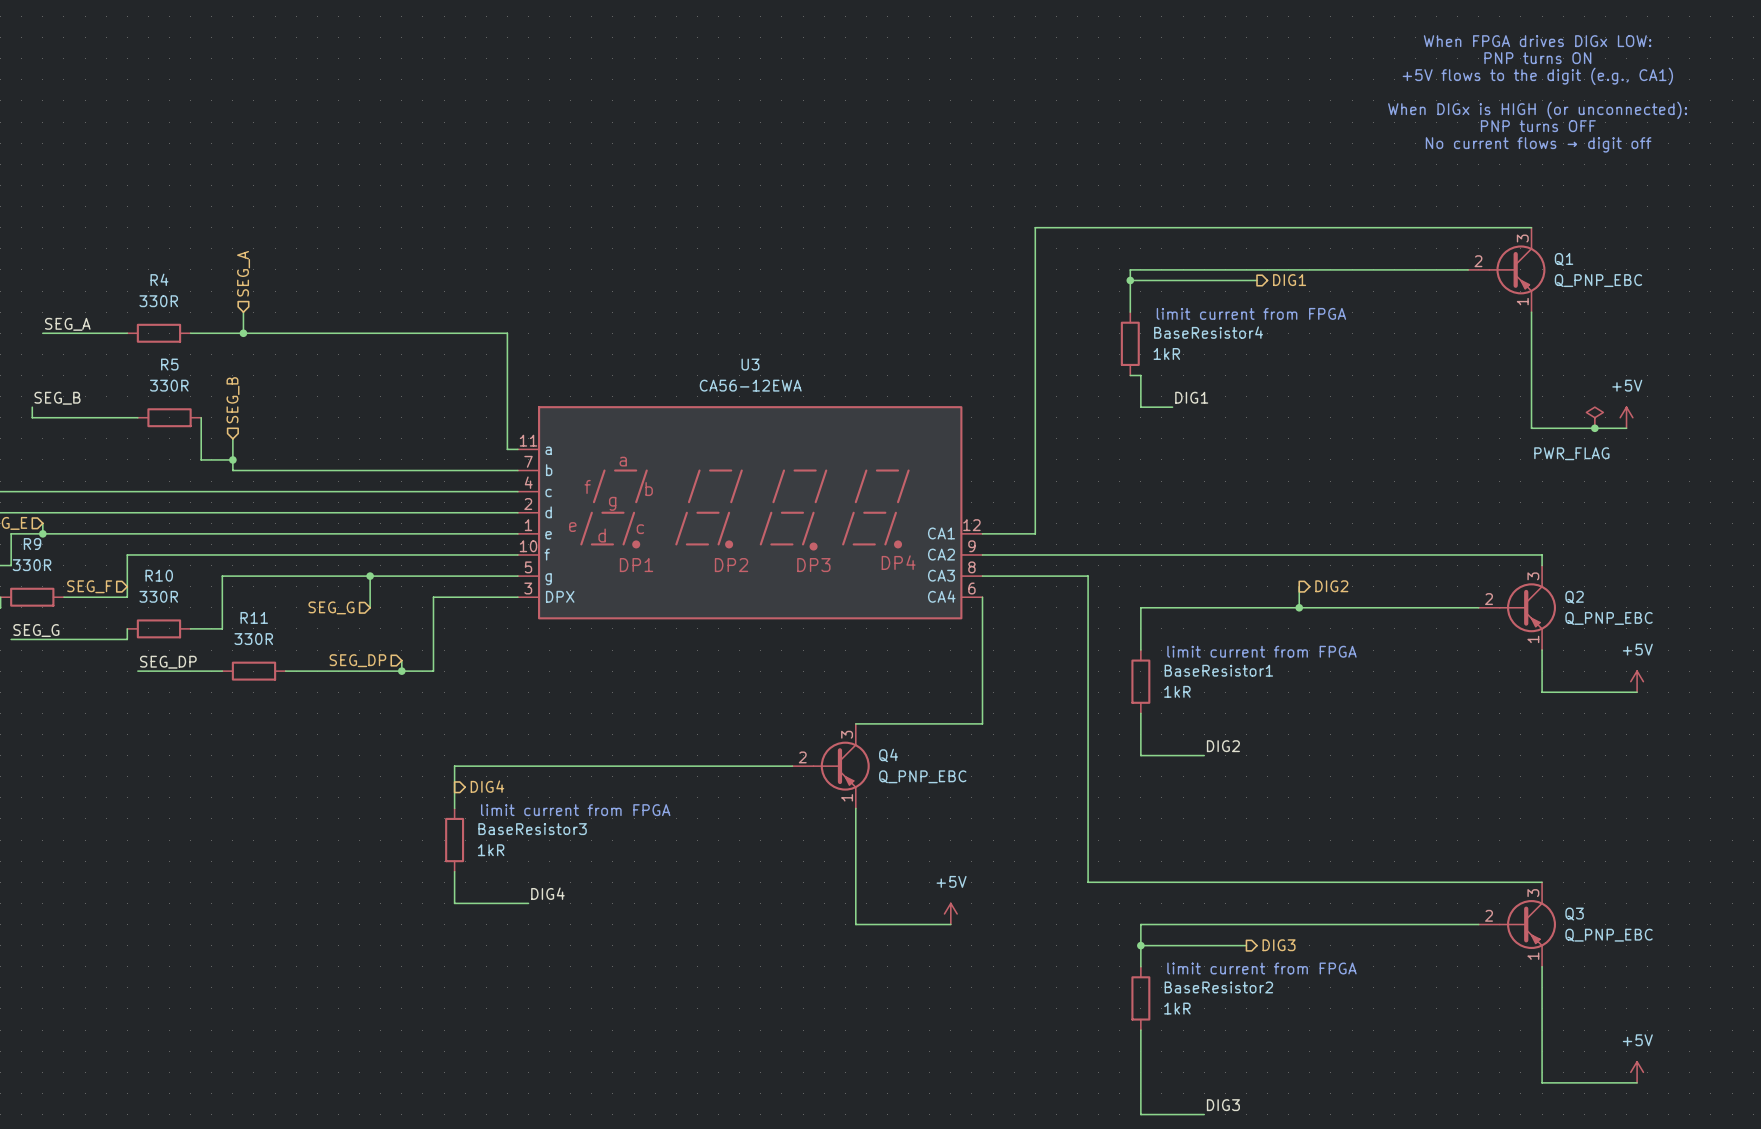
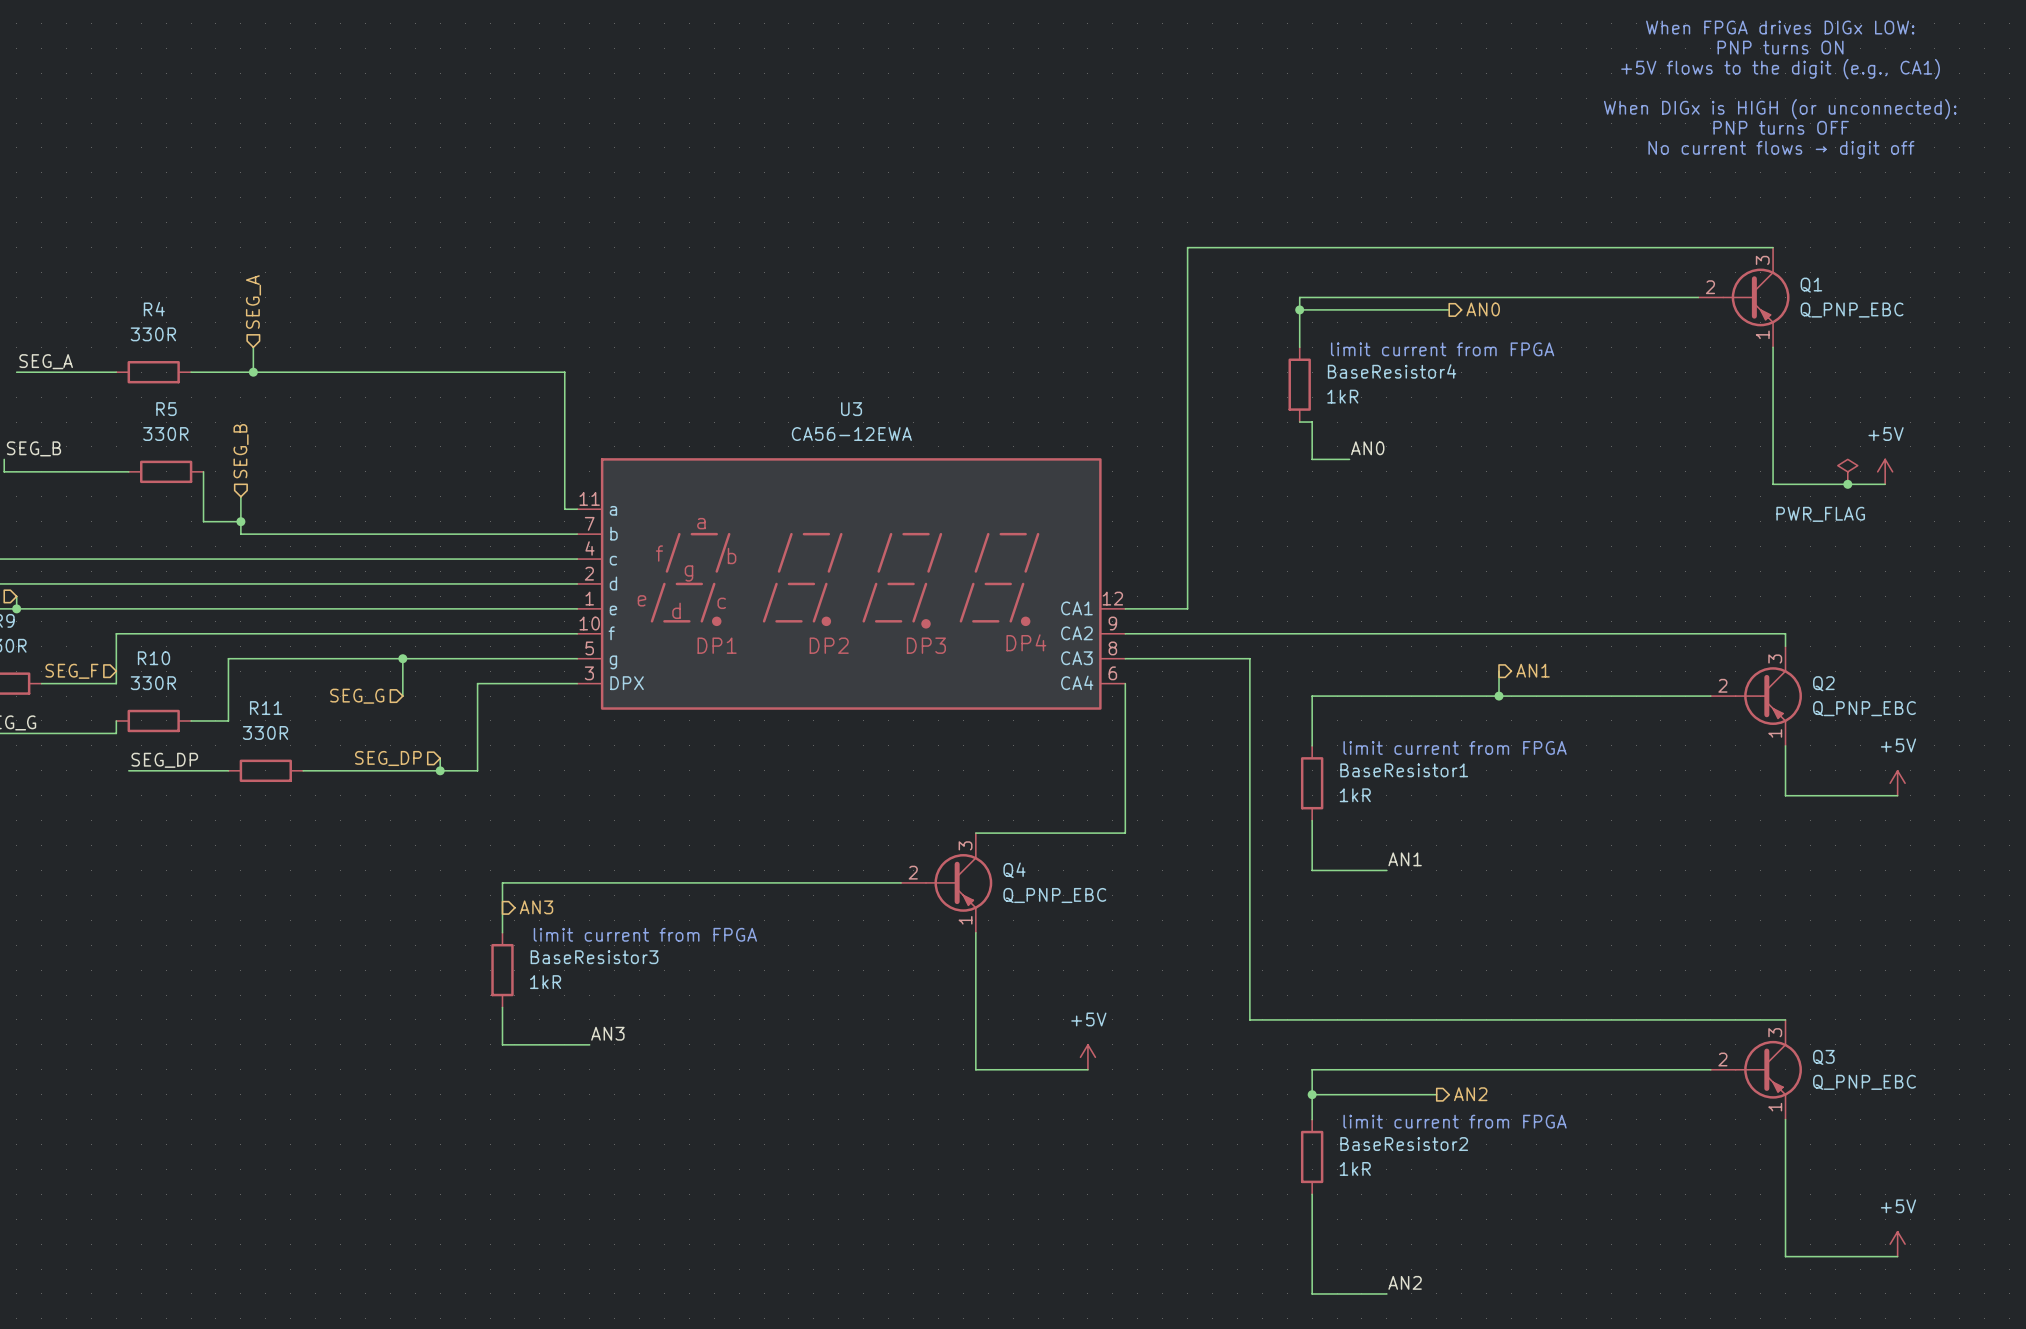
hierarchical label: DIG1 (1289, 280) -> AN0 (1483, 309)
label: DIG1 (1191, 397) -> AN0 (1367, 448)
hierarchical label: DIG2 (1331, 586) -> AN1 (1533, 670)
label: DIG2 (1223, 746) -> AN1 (1405, 859)
hierarchical label: DIG4 (487, 786) -> AN3 (536, 907)
label: DIG4 (547, 893) -> AN3 (607, 1033)
hierarchical label: DIG3 (1279, 945) -> AN2 (1470, 1094)
label: DIG3 (1223, 1105) -> AN2 (1405, 1282)

